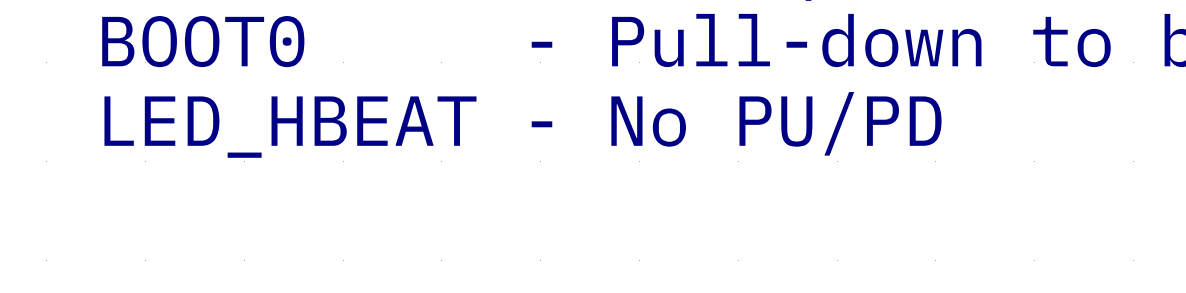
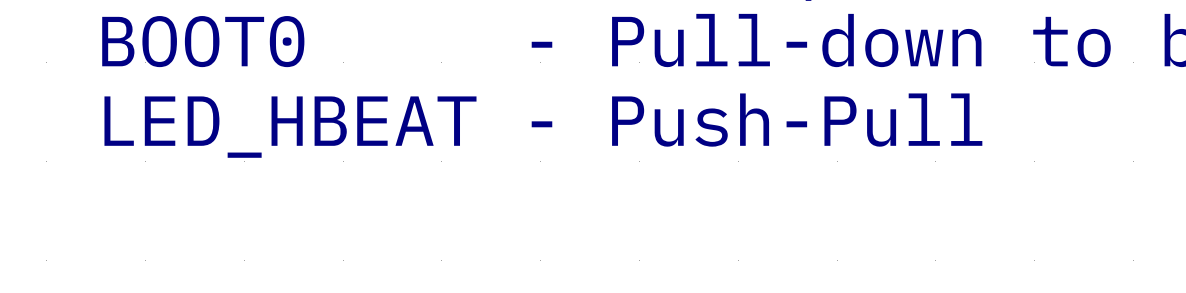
text: LED_HBEAT - No PU/PD (523, 124) -> LED_HBEAT - Push-Pull (543, 125)

